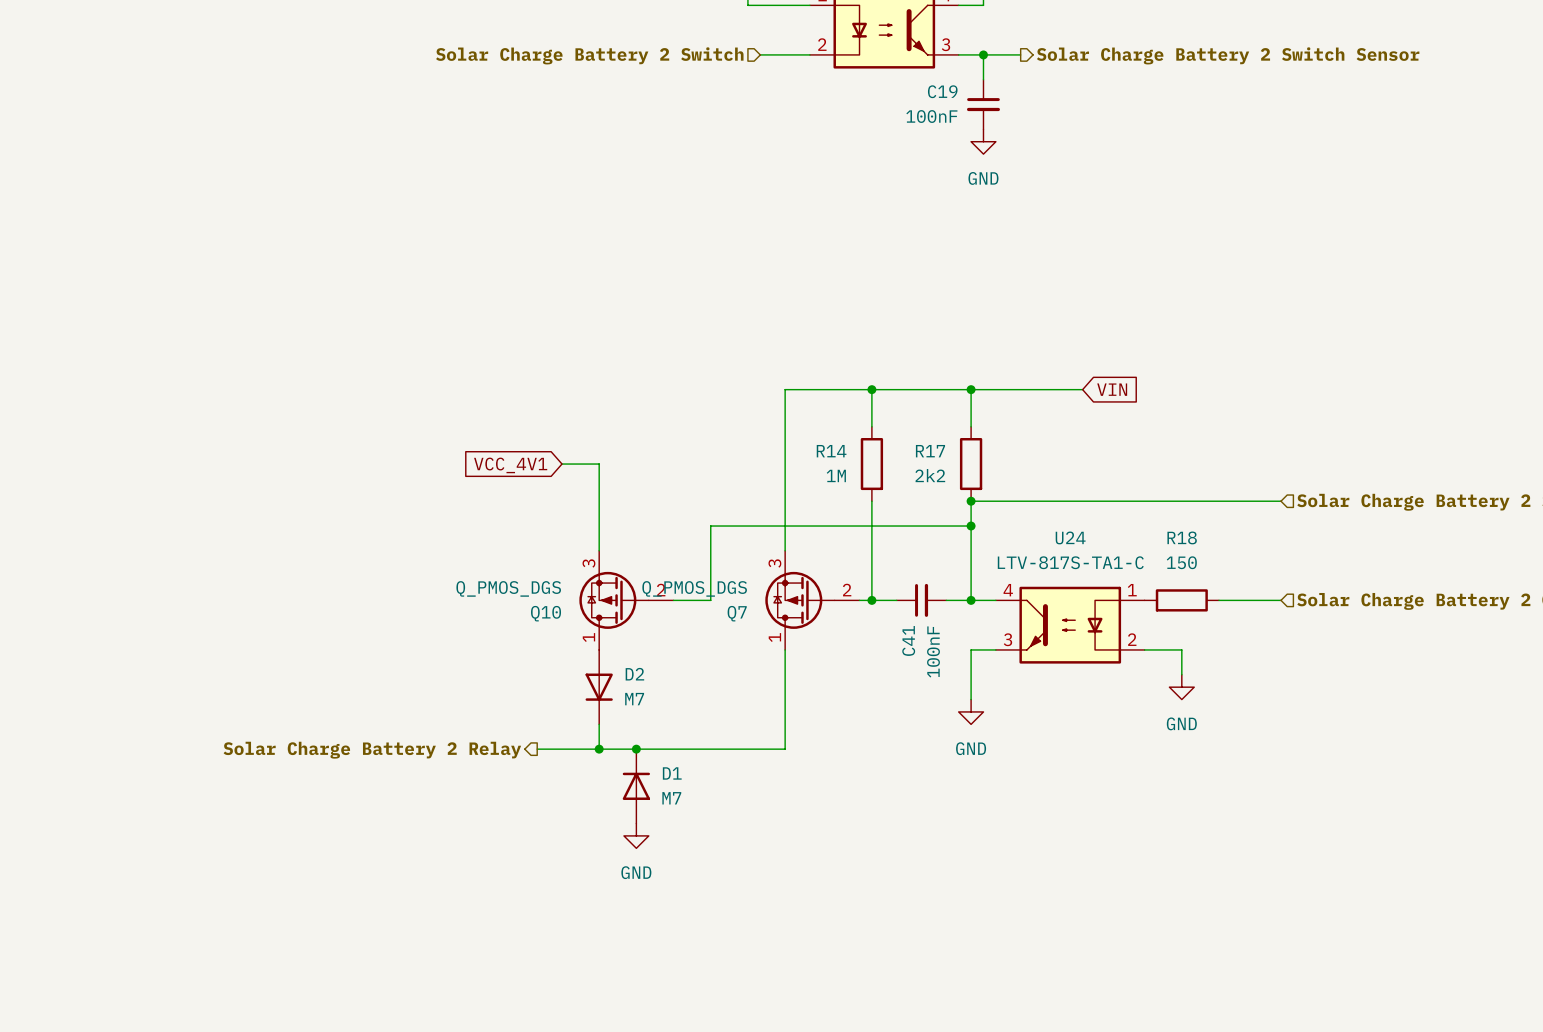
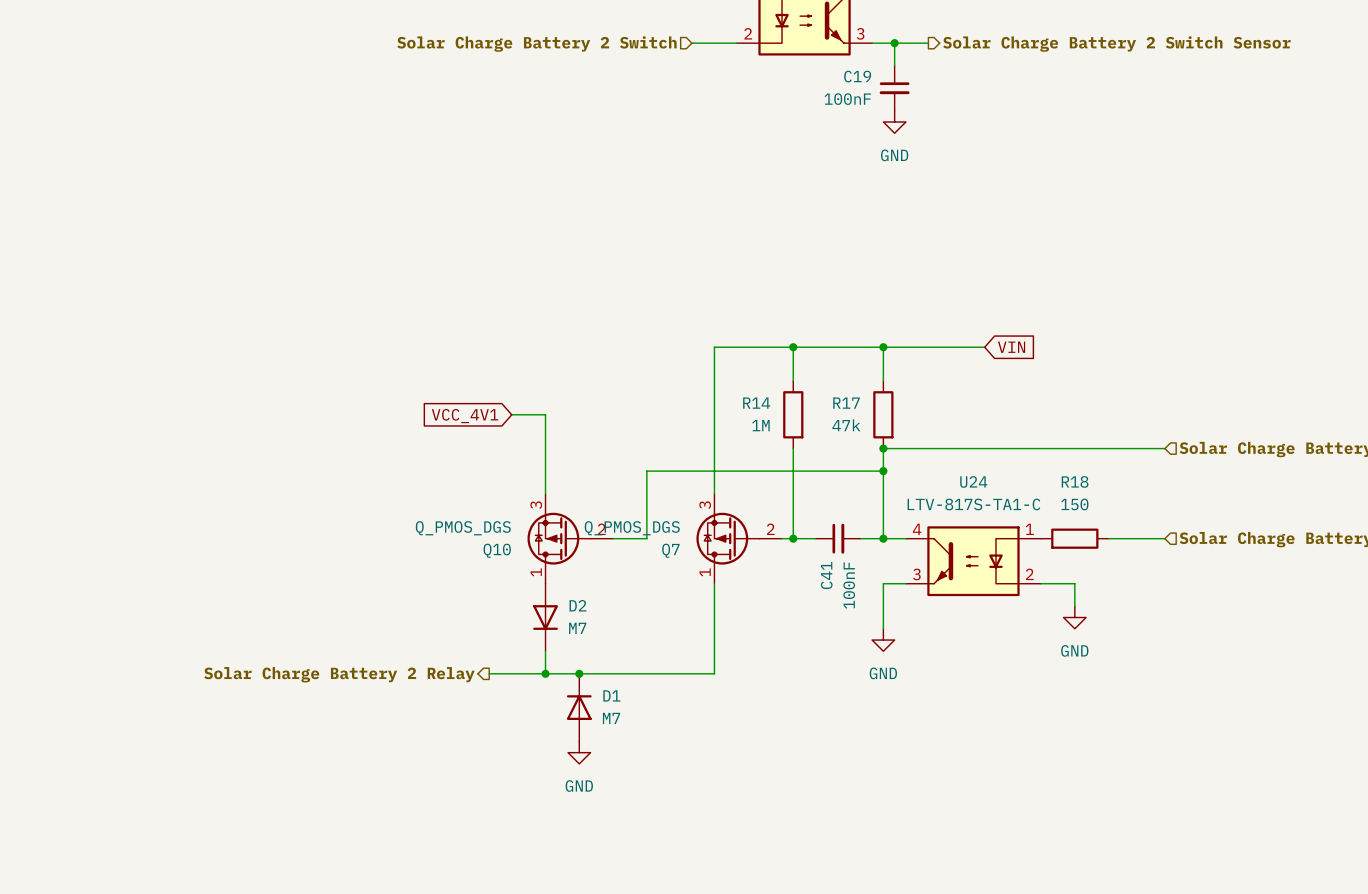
R17 value: 2k2 (930, 475) -> 47k (846, 425)

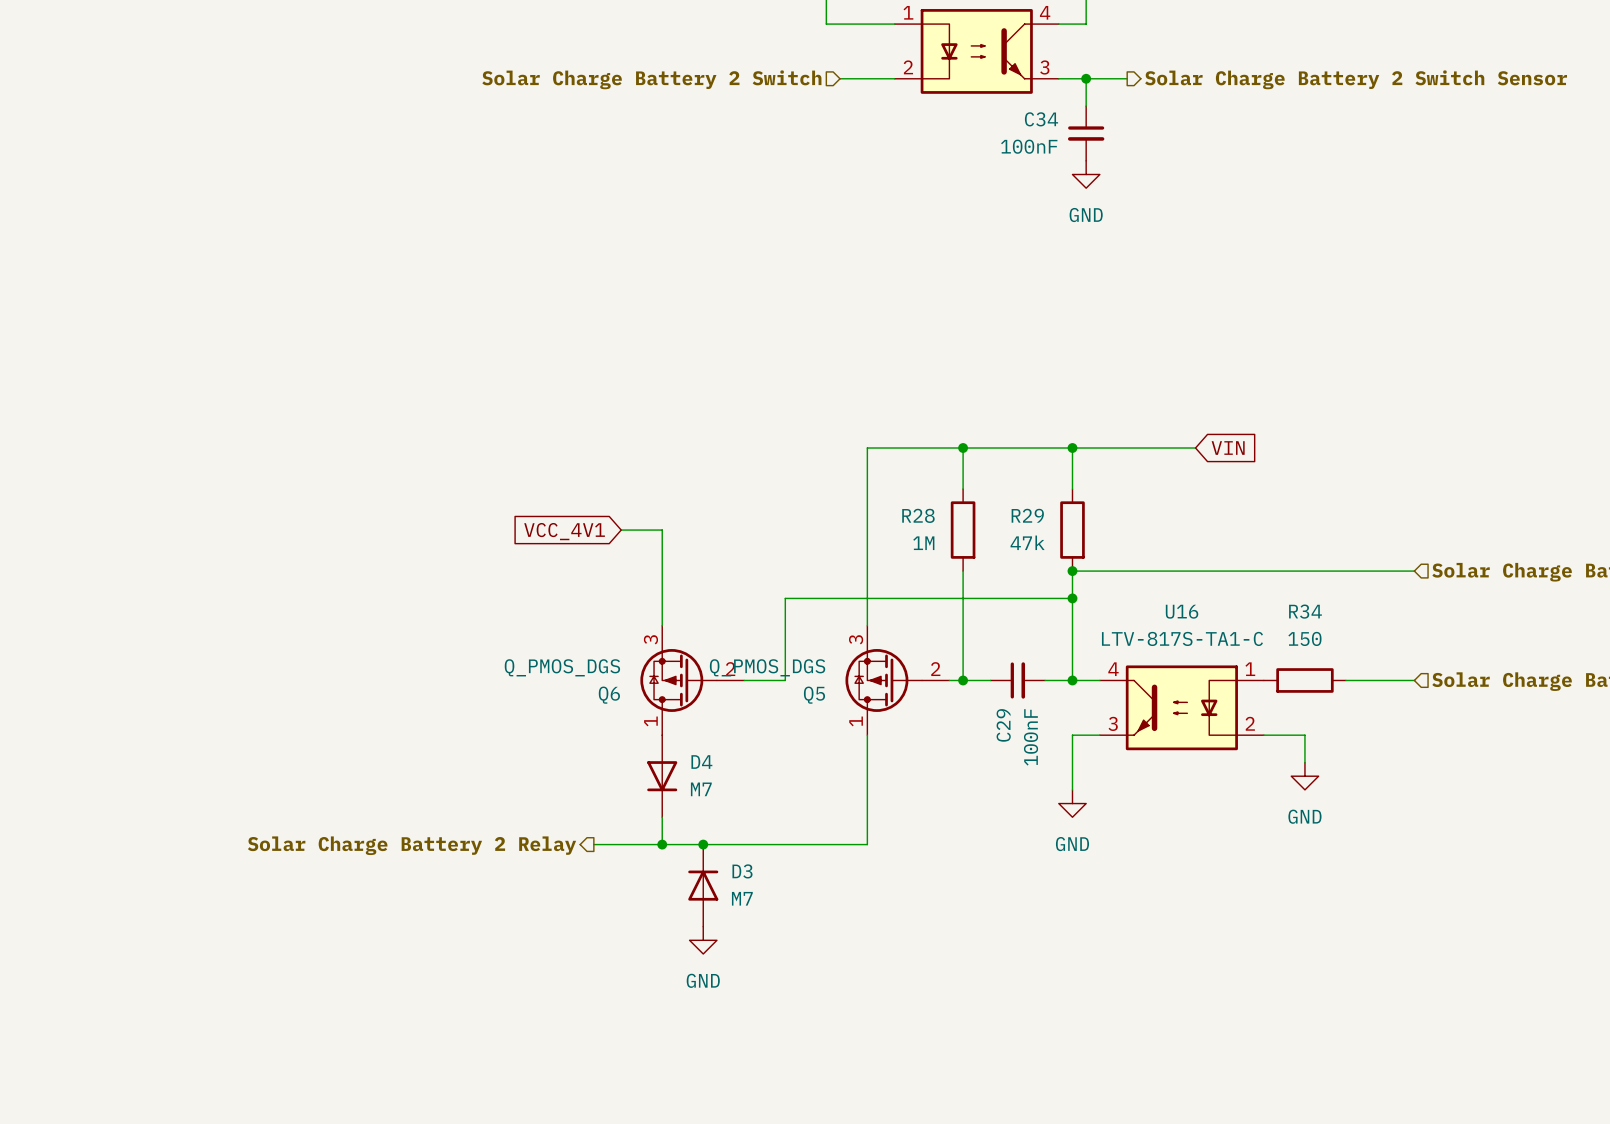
C19 name: C19 (857, 76) -> C34 (1041, 119)
R14 name: R14 (756, 403) -> R28 (918, 515)
R17 name: R17 (846, 403) -> R29 (1027, 515)
U24 name: U24 (973, 481) -> U16 (1182, 611)
R18 name: R18 (1075, 481) -> R34 (1305, 611)
Q10 name: Q10 (497, 550) -> Q6 (609, 695)
Q7 name: Q7 (670, 550) -> Q5 (814, 695)
C41 name: C41 (826, 575) -> C29 (1003, 725)
D2 name: D2 (577, 605) -> D4 (701, 762)
D1 name: D1 (611, 695) -> D3 (742, 871)

